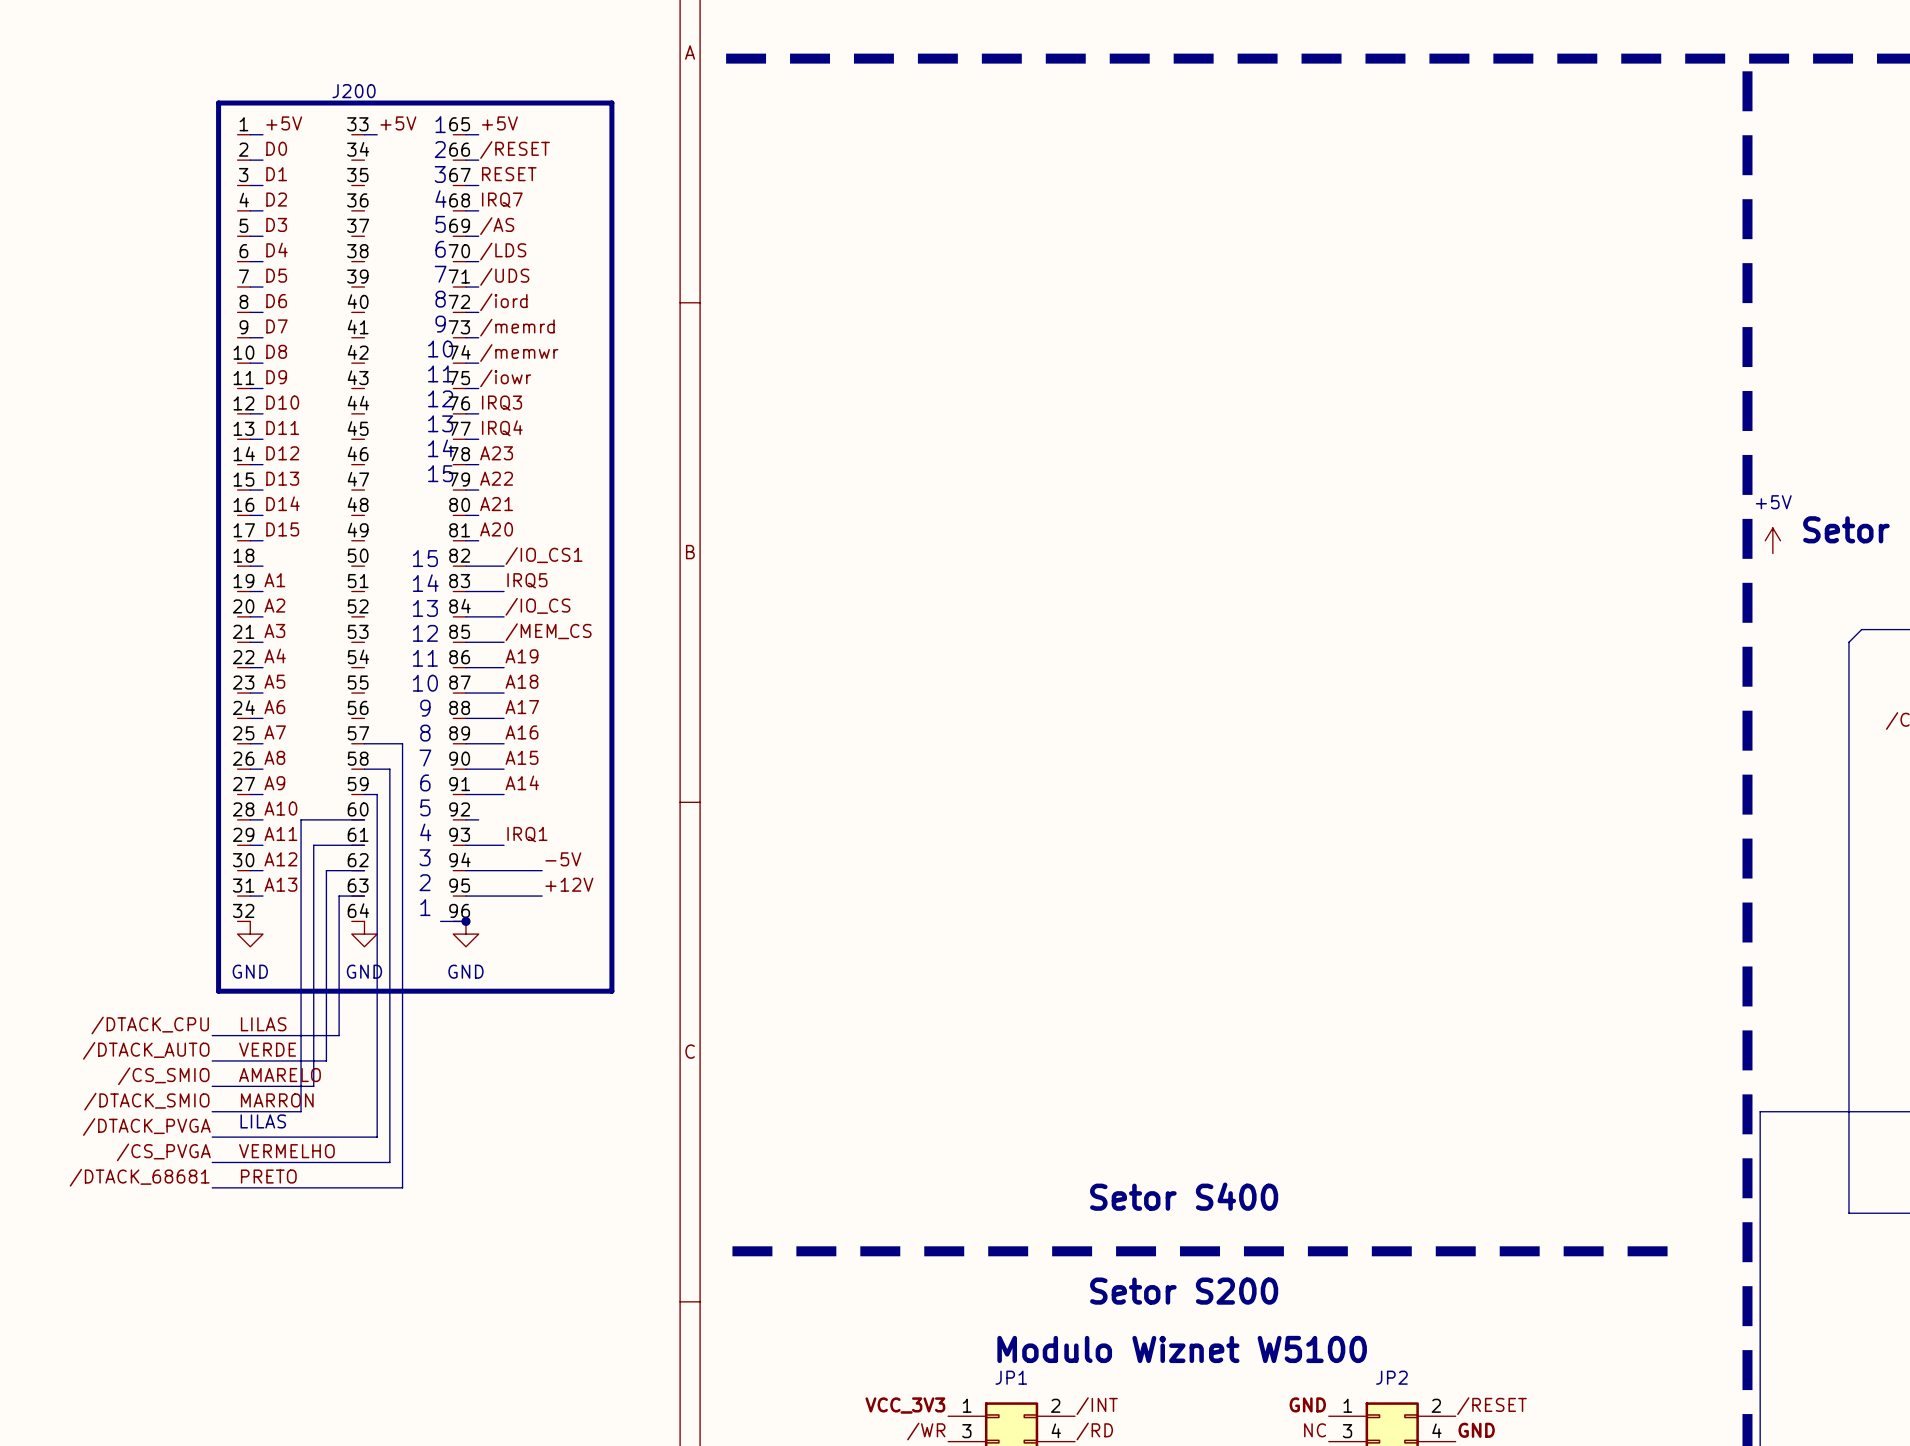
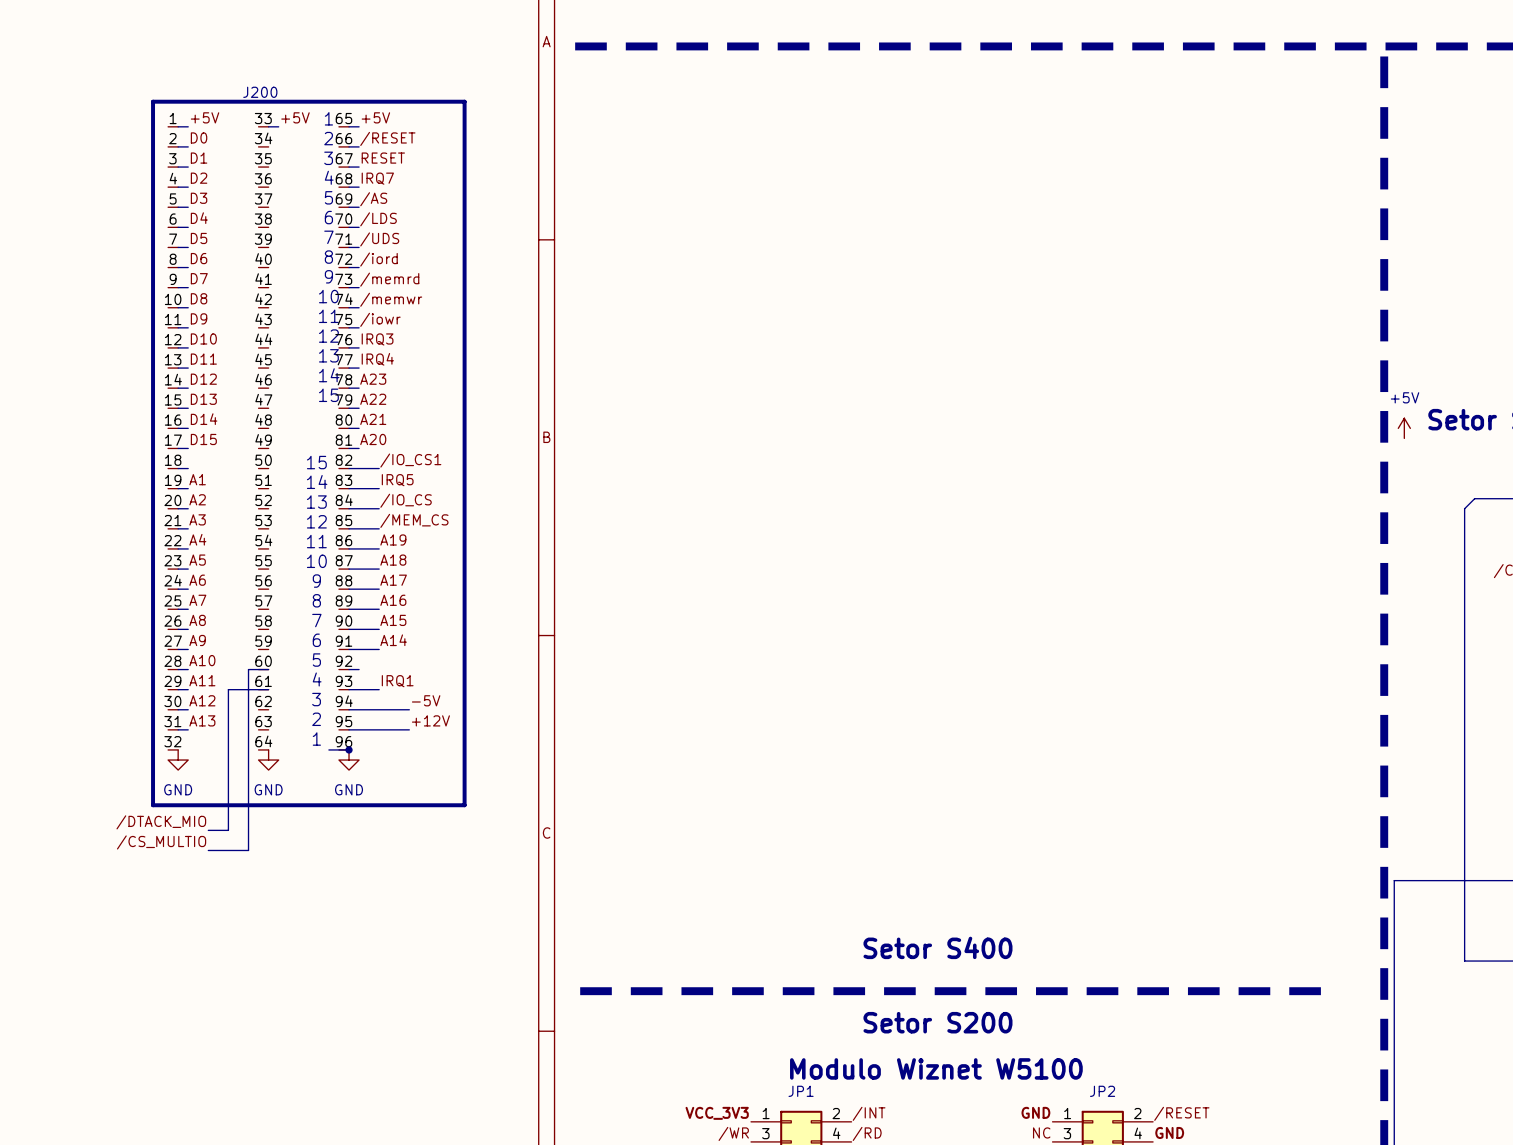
line: (218, 103) (611, 103) (611, 991) (218, 991) (218, 103) -> (153, 101) (464, 101) (464, 805) (153, 805) (153, 101)
label position: +5V (284, 123) -> +5V (205, 117)
label position: +5V (398, 123) -> +5V (295, 117)
label position: +5V (499, 123) -> +5V (375, 117)
text position: 1 (440, 124) -> 1 (328, 118)
wire: (250, 134) (262, 134) -> (178, 126) (188, 126)
wire: (364, 134) (377, 134) -> (268, 126) (278, 126)
wire: (465, 134) (478, 134) -> (349, 126) (359, 126)
label position: D0 (276, 148) -> D0 (199, 137)
text position: 2 (440, 149) -> 2 (328, 138)
label position: /RESET (515, 150) -> /RESET (387, 138)
wire: (250, 160) (262, 160) -> (178, 146) (188, 146)
wire: (465, 160) (478, 160) -> (349, 146) (359, 146)
label position: D1 (276, 174) -> D1 (199, 158)
text position: 3 (440, 174) -> 3 (328, 158)
label position: RESET (509, 174) -> RESET (383, 158)
wire: (250, 185) (262, 185) -> (178, 167) (188, 167)
wire: (465, 185) (478, 185) -> (349, 167) (359, 167)
label position: D2 (276, 199) -> D2 (199, 178)
text position: 4 (440, 199) -> 4 (329, 177)
label position: IRQ7 (502, 200) -> IRQ7 (377, 178)
wire: (250, 210) (262, 210) -> (178, 187) (188, 187)
wire: (465, 210) (478, 210) -> (349, 187) (359, 187)
label position: D3 (276, 224) -> D3 (199, 198)
text position: 5 (440, 224) -> 5 (328, 197)
label position: /AS (497, 226) -> /AS (373, 199)
wire: (250, 236) (262, 236) -> (178, 207) (188, 207)
wire: (465, 236) (478, 236) -> (349, 207) (359, 207)
text position: 6 (440, 249) -> 6 (328, 217)
label position: D4 (276, 250) -> D4 (199, 218)
label position: /LDS (503, 251) -> /LDS (378, 219)
wire: (250, 261) (262, 261) -> (178, 227) (188, 227)
wire: (465, 261) (478, 261) -> (349, 227) (359, 227)
text position: 7 (440, 274) -> 7 (328, 237)
label position: D5 (276, 275) -> D5 (199, 238)
label position: /UDS (504, 276) -> /UDS (379, 239)
wire: (250, 287) (262, 287) -> (178, 247) (188, 247)
wire: (465, 287) (478, 287) -> (349, 247) (359, 247)
text position: 8 (440, 299) -> 8 (328, 257)
label position: D6 (276, 301) -> D6 (199, 258)
label position: /iord (503, 302) -> /iord (379, 259)
wire: (250, 312) (262, 312) -> (178, 267) (188, 267)
wire: (465, 312) (478, 312) -> (349, 267) (359, 267)
text position: 9 (440, 324) -> 9 (328, 276)
label position: D7 (276, 326) -> D7 (199, 278)
label position: /memrd (517, 327) -> /memrd (389, 279)
wire: (250, 337) (262, 337) -> (178, 287) (188, 287)
wire: (465, 337) (478, 337) -> (349, 287) (359, 287)
text position: 10 (440, 349) -> 10 (328, 296)
label position: D8 (276, 351) -> D8 (199, 298)
label position: /memwr (519, 353) -> /memwr (391, 299)
wire: (250, 363) (262, 363) -> (178, 307) (188, 307)
wire: (465, 363) (478, 363) -> (349, 307) (359, 307)
text position: 11 (440, 373) -> 11 (328, 316)
label position: D9 (276, 377) -> D9 (199, 318)
label position: /iowr (505, 378) -> /iowr (380, 319)
wire: (250, 388) (262, 388) -> (178, 327) (188, 327)
wire: (465, 388) (478, 388) -> (349, 327) (359, 327)
text position: 12 (440, 398) -> 12 (328, 336)
label position: D10 (282, 402) -> D10 (203, 338)
label position: IRQ3 (502, 403) -> IRQ3 (377, 339)
wire: (250, 413) (262, 413) -> (178, 347) (188, 347)
wire: (465, 413) (478, 413) -> (349, 347) (359, 347)
text position: 13 (440, 423) -> 13 (328, 355)
label position: D11 (282, 427) -> D11 (203, 359)
label position: IRQ4 (502, 428) -> IRQ4 (377, 359)
wire: (250, 439) (262, 439) -> (178, 368) (188, 368)
wire: (465, 439) (478, 439) -> (349, 368) (359, 368)
text position: 14 (440, 448) -> 14 (329, 375)
label position: D12 (282, 453) -> D12 (203, 379)
label position: A23 (496, 453) -> A23 (373, 379)
wire: (250, 464) (262, 464) -> (178, 388) (188, 388)
wire: (465, 464) (478, 464) -> (349, 388) (359, 388)
text position: 15 (440, 473) -> 15 (328, 395)
label position: D13 (282, 478) -> D13 (203, 399)
label position: A22 (496, 478) -> A22 (373, 399)
wire: (250, 490) (262, 490) -> (178, 408) (188, 408)
wire: (465, 490) (478, 490) -> (349, 408) (359, 408)
label position: D14 (283, 503) -> D14 (204, 419)
label position: A21 (496, 504) -> A21 (373, 419)
wire: (250, 515) (262, 515) -> (178, 428) (188, 428)
wire: (465, 515) (478, 515) -> (349, 428) (359, 428)
J200 position: (351, 528) -> (258, 438)
label position: D15 (282, 529) -> D15 (203, 439)
label position: A20 (496, 529) -> A20 (373, 439)
wire: (250, 540) (262, 540) -> (178, 448) (188, 448)
wire: (465, 540) (478, 540) -> (349, 448) (359, 448)
label position: /IO_CS1 (544, 556) -> /IO_CS1 (410, 460)
text position: 15 (425, 558) -> 15 (316, 462)
wire: (250, 566) (262, 566) -> (178, 468) (188, 468)
wire: (465, 566) (504, 566) -> none
label position: A1 (274, 580) -> A1 (197, 479)
label position: IRQ5 (527, 580) -> IRQ5 (397, 480)
text position: 14 (425, 583) -> 14 (317, 482)
wire: (250, 591) (262, 591) -> (178, 488) (188, 488)
wire: (478, 591) (504, 591) -> (349, 468) (369, 468)
label position: A2 (274, 605) -> A2 (197, 499)
label position: /IO_CS (537, 606) -> /IO_CS (406, 500)
text position: 13 (425, 608) -> 13 (316, 502)
wire: (250, 616) (262, 616) -> (178, 508) (188, 508)
wire: (478, 616) (504, 616) -> (349, 488) (369, 488)
label position: A3 (274, 630) -> A3 (197, 519)
label position: /MEM_CS (548, 632) -> /MEM_CS (414, 520)
text position: 12 (425, 633) -> 12 (316, 521)
wire: (250, 642) (262, 642) -> (178, 528) (188, 528)
wire: (478, 642) (504, 642) -> (349, 508) (369, 508)
label position: A4 (275, 656) -> A4 (197, 539)
label position: A19 (521, 656) -> A19 (393, 539)
text position: 11 (425, 658) -> 11 (316, 541)
wire: (250, 667) (262, 667) -> (178, 548) (188, 548)
wire: (478, 667) (504, 667) -> (349, 528) (369, 528)
label position: A5 (274, 681) -> A5 (197, 560)
label position: A18 (521, 681) -> A18 (393, 560)
text position: 10 (425, 683) -> 10 (316, 561)
wire: (250, 693) (262, 693) -> (178, 569) (188, 569)
wire: (478, 693) (504, 693) -> (349, 548) (369, 548)
label position: A6 (274, 707) -> A6 (197, 580)
label position: A17 (522, 707) -> A17 (393, 580)
text position: 9 (425, 708) -> 9 (316, 581)
wire: (250, 718) (262, 718) -> (178, 589) (188, 589)
wire: (478, 718) (504, 718) -> (349, 569) (369, 569)
label position: A7 (275, 732) -> A7 (197, 600)
label position: A16 (521, 732) -> A16 (393, 600)
text position: 8 (425, 733) -> 8 (316, 600)
wire: (250, 743) (262, 743) -> (178, 609) (188, 609)
wire: (364, 743) (402, 743) (402, 1187) (212, 1187) -> none
wire: (478, 743) (504, 743) -> (349, 589) (369, 589)
label position: A8 (274, 757) -> A8 (197, 620)
label position: A15 (521, 757) -> A15 (393, 620)
text position: 7 (425, 758) -> 7 (316, 620)
wire: (250, 769) (262, 769) -> (178, 629) (188, 629)
wire: (364, 769) (389, 769) (389, 1162) (212, 1162) -> none
wire: (478, 769) (504, 769) -> (349, 609) (369, 609)
text position: 6 (425, 782) -> 6 (316, 640)
label position: A14 (522, 782) -> A14 (393, 640)
label position: A9 (274, 783) -> A9 (197, 640)
wire: (250, 794) (262, 794) -> (178, 649) (188, 649)
wire: (364, 794) (377, 794) (377, 1137) (212, 1137) -> none
wire: (478, 794) (504, 794) -> (349, 629) (369, 629)
text position: 5 (425, 807) -> 5 (316, 660)
label position: A10 (280, 808) -> A10 (202, 660)
wire: (250, 819) (262, 819) -> (178, 669) (188, 669)
wire: (364, 819) (301, 819) (301, 1111) (212, 1111) -> none
text position: 4 (425, 832) -> 4 (317, 679)
label position: A11 (280, 833) -> A11 (202, 680)
label position: IRQ1 (527, 834) -> IRQ1 (397, 681)
wire: (250, 845) (262, 845) -> (178, 689) (188, 689)
wire: (339, 845) (364, 845) -> (349, 689) (369, 689)
wire: none -> (349, 669) (359, 669)
wire: (465, 845) (504, 845) -> none
text position: 3 (425, 857) -> 3 (316, 699)
label position: A12 (280, 859) -> A12 (202, 700)
label position: -5V (563, 859) -> -5V (426, 700)
wire: (250, 870) (262, 870) -> (178, 709) (188, 709)
wire: (326, 870) (326, 1060) (212, 1060) -> (258, 689) (228, 689) (228, 830) (208, 830)
wire: (339, 870) (364, 870) -> (349, 709) (369, 709)
wire: (478, 870) (542, 870) -> none
text position: 2 (425, 882) -> 2 (316, 719)
label position: A13 (280, 884) -> A13 (202, 720)
label position: +12V (569, 884) -> +12V (430, 720)
wire: (250, 896) (262, 896) -> (178, 729) (188, 729)
wire: (364, 896) (339, 896) (339, 1035) (212, 1035) -> none
wire: (516, 896) (542, 896) -> (349, 649) (369, 649)
text position: 1 (425, 907) -> 1 (316, 739)
wire: none -> (369, 729) (409, 729)
junction position: (465, 921) -> (349, 749)
power symbol position: GND (250, 934) -> GND (178, 760)
power symbol position: GND (364, 934) -> GND (268, 760)
power symbol position: GND (465, 934) -> GND (349, 760)
wire: none -> (328, 749) (349, 749)
label: LILAS (263, 1024) -> none
label: /DTACK_CPU (150, 1025) -> none
label: none -> /DTACK_MIO (161, 822)
label: VERDE (267, 1049) -> none
label: /DTACK_AUTO (146, 1050) -> none
wire: (313, 1073) (313, 1086) (212, 1086) -> (248, 850) (208, 850)
label: AMARELO (279, 1075) -> none
label: /CS_SMIO (163, 1076) -> /CS_MULTIO (161, 842)
label: MARRON (277, 1100) -> none
label: /DTACK_SMIO (146, 1101) -> none
text: LILAS (263, 1121) -> none
label: /DTACK_PVGA (146, 1126) -> none
label: VERMELHO (286, 1151) -> none
label: /CS_PVGA (163, 1152) -> none
label: PRETO (268, 1176) -> none
label: /DTACK_68681 (139, 1177) -> none

